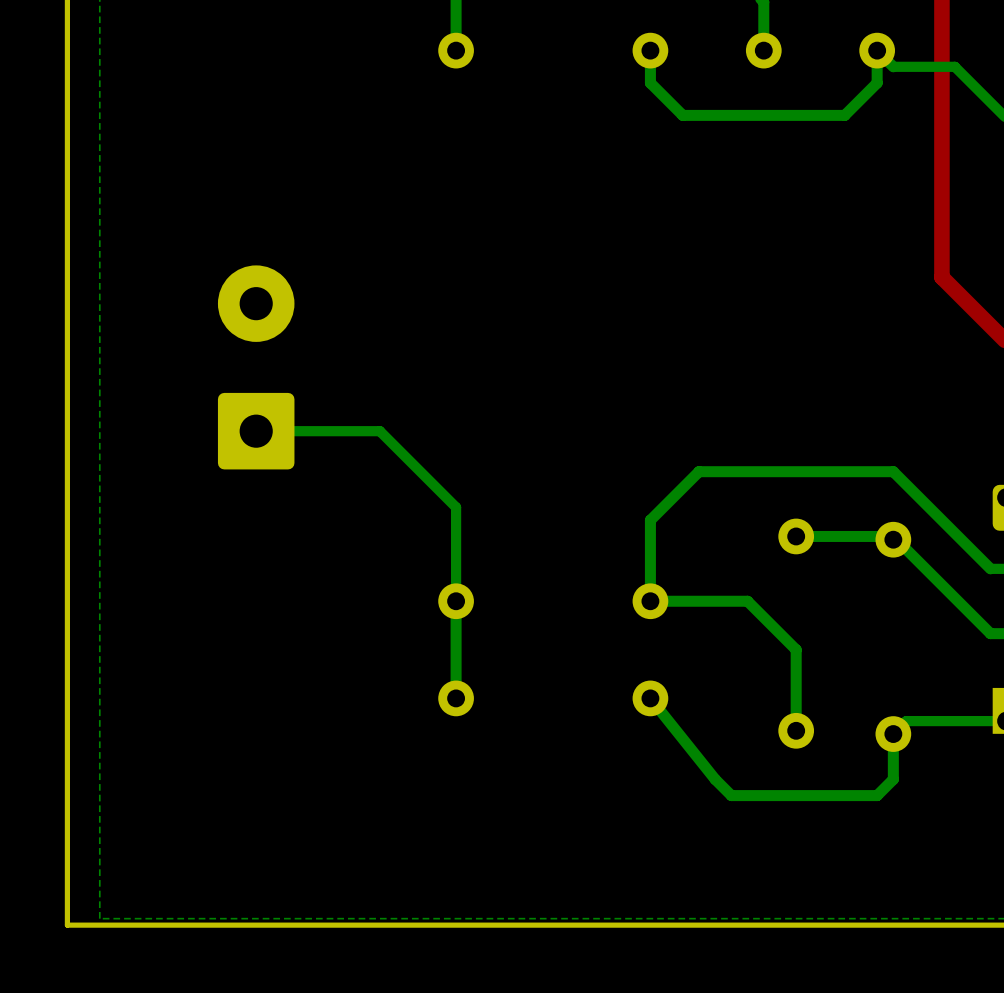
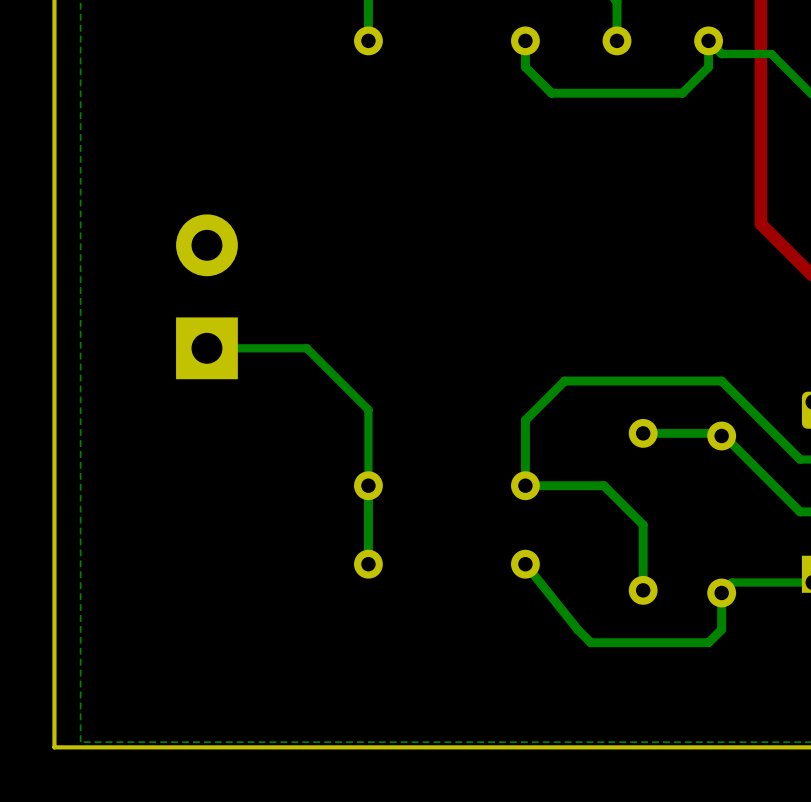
part footprint: [217, 265, 295, 470] -> [176, 214, 238, 380]

